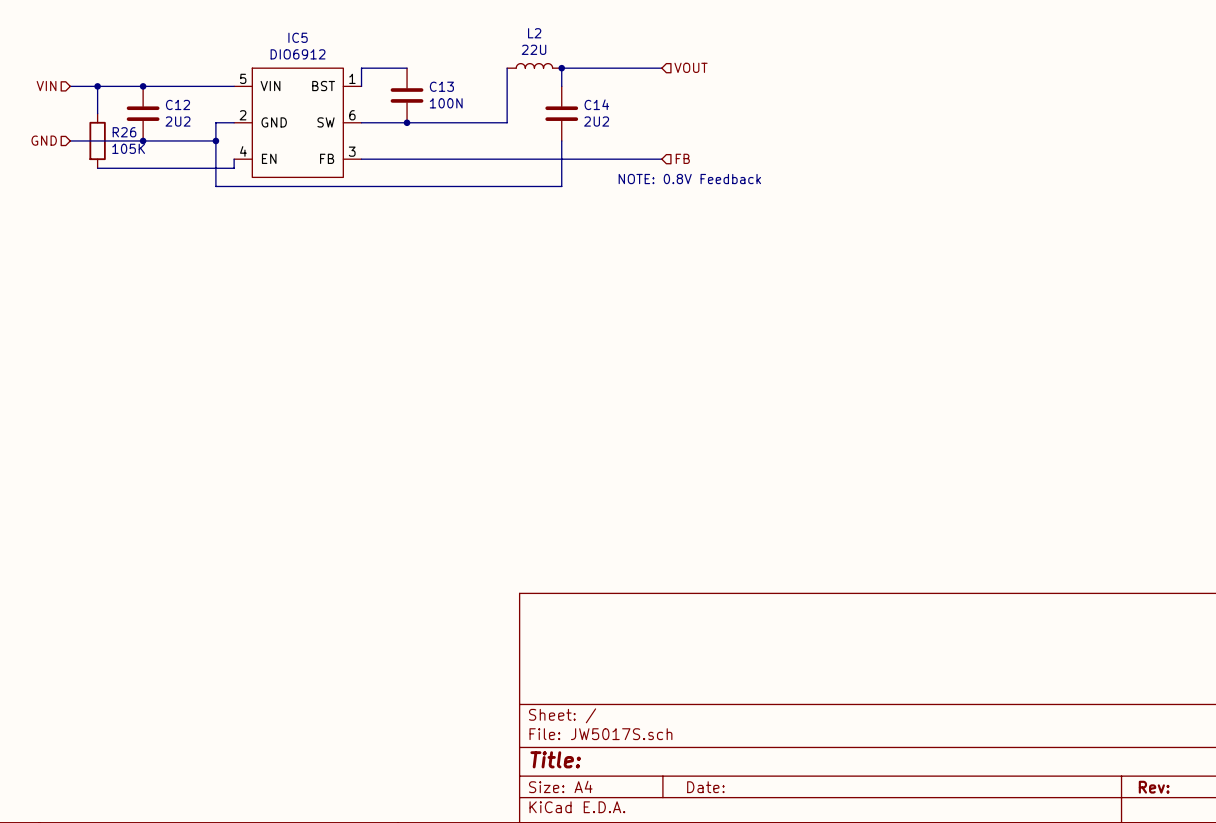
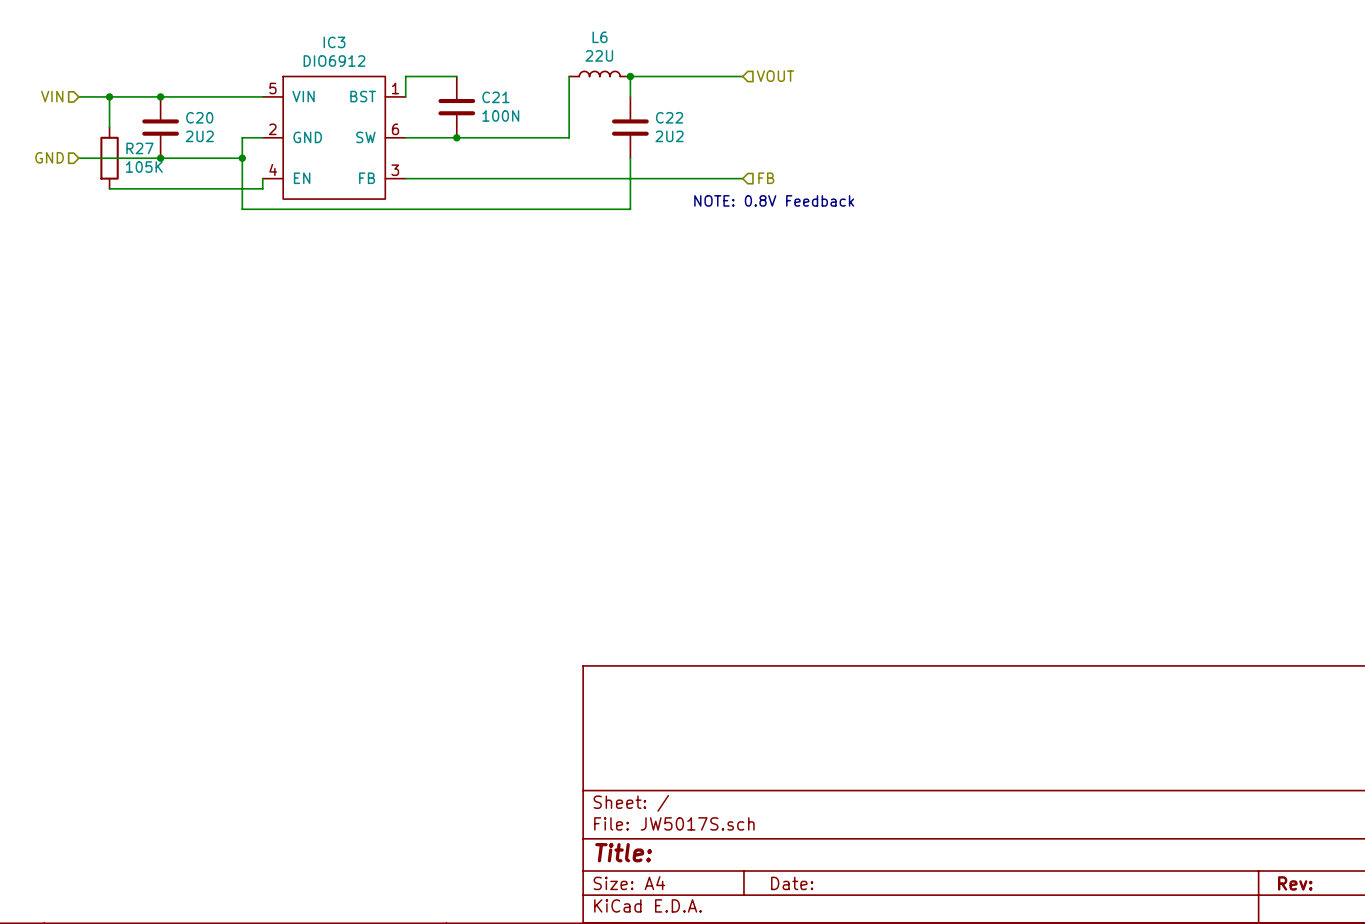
L2 name: L2 (534, 33) -> L6 (600, 37)
IC5 name: IC5 (298, 37) -> IC3 (334, 42)
C13 name: C13 (441, 86) -> C21 (495, 97)
C12 name: C12 (177, 104) -> C20 (199, 117)
C14 name: C14 (596, 104) -> C22 (669, 117)
R26 name: R26 (124, 132) -> R27 (139, 148)

